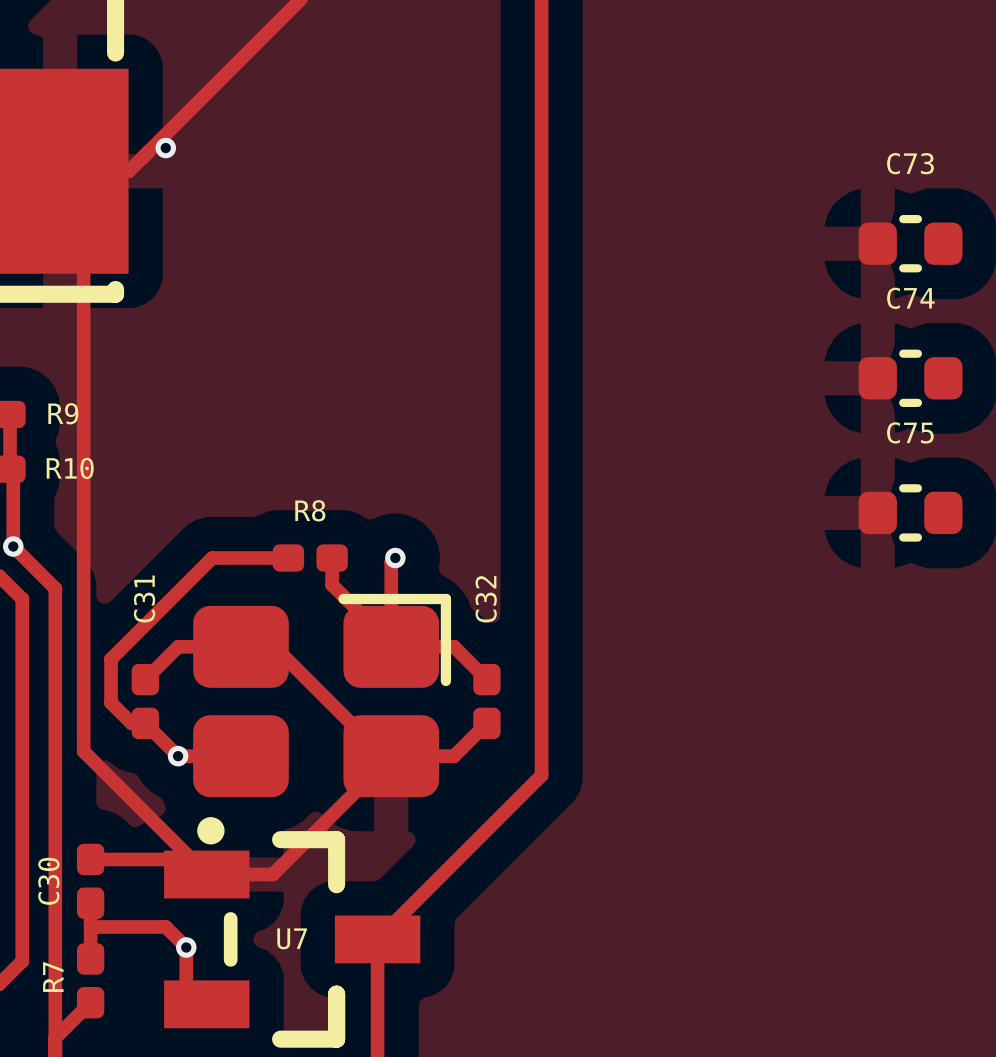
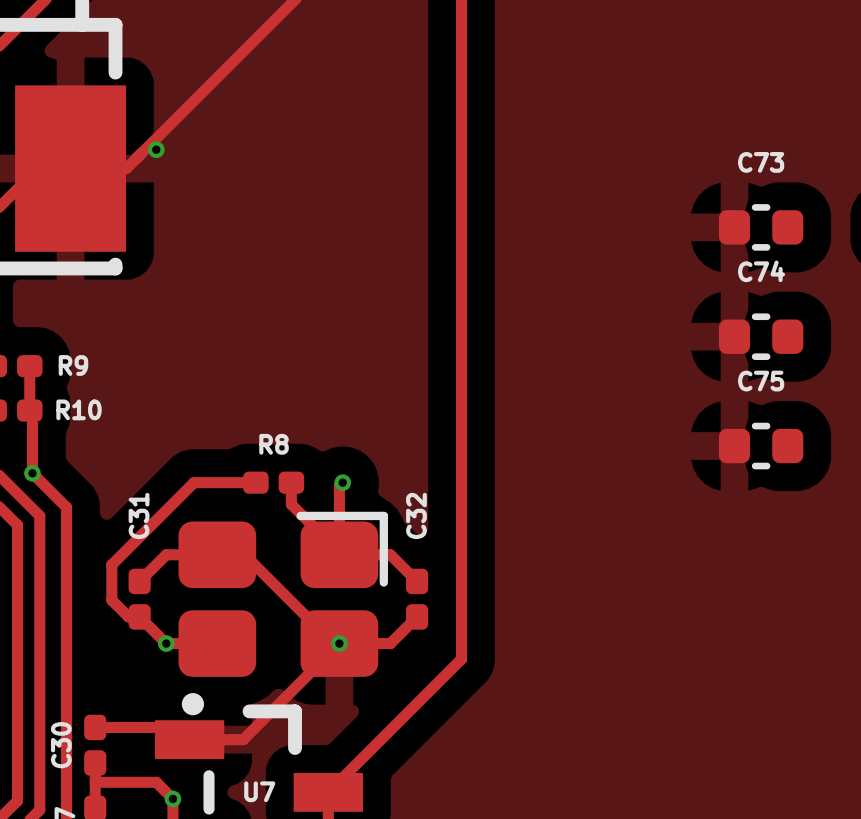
track: (60, 171) (83, 194) (83, 751) (191, 859) -> none
via: none -> (339, 643)

